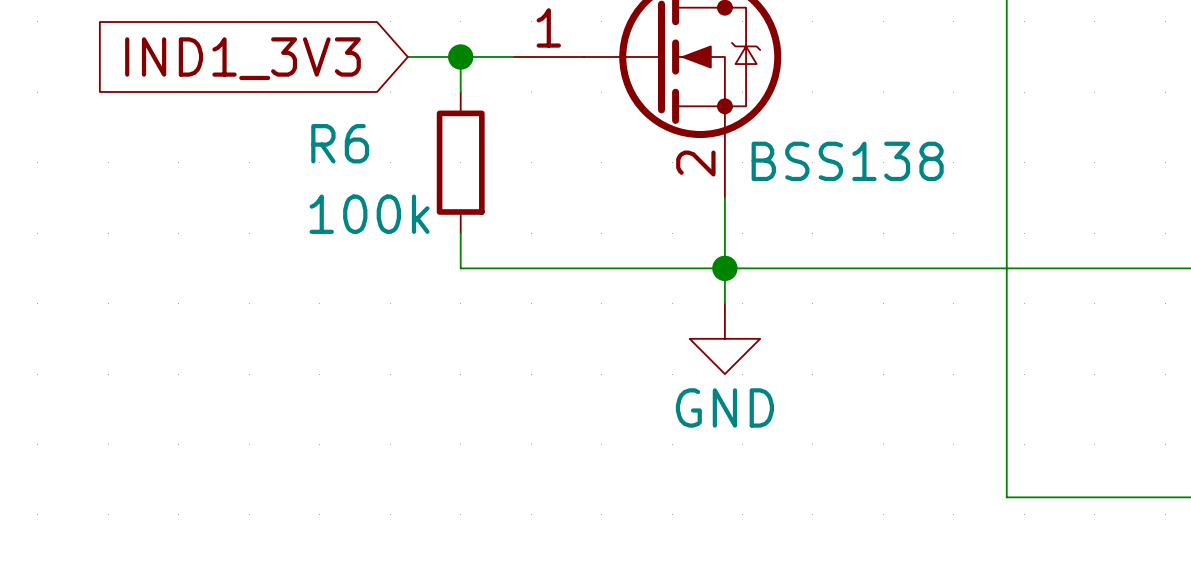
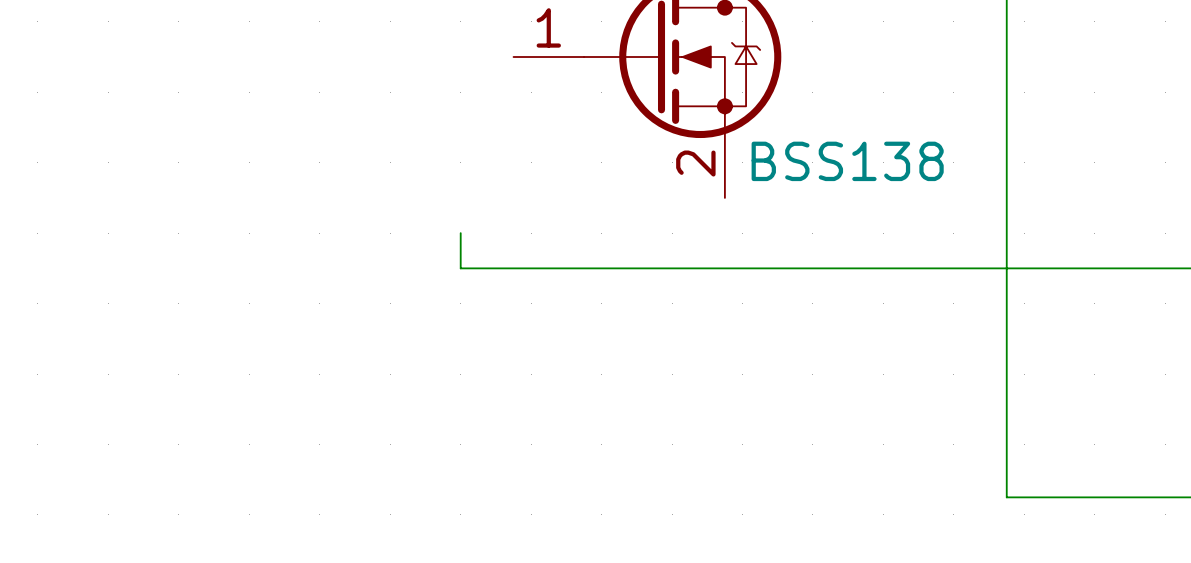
wire: (407, 57) (513, 57) -> none
wire: (460, 57) (460, 92) -> none
junction: (460, 57) -> none
global label: IND1_3V3 (242, 58) -> none
R6: 100k (460, 162) -> none
wire: (724, 197) (724, 303) -> none
junction: (724, 268) -> none
power symbol: GND (724, 338) -> none

